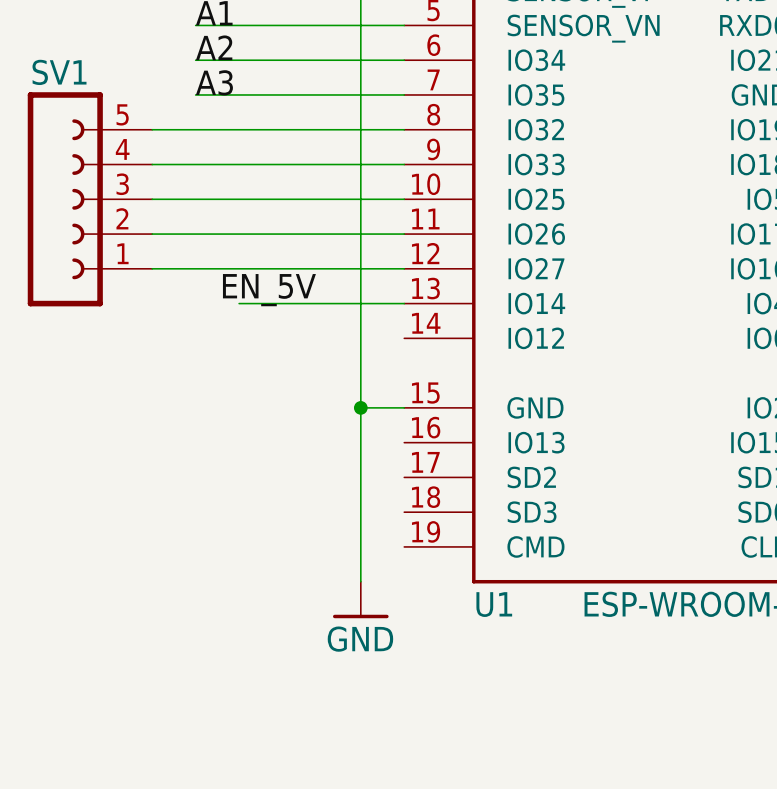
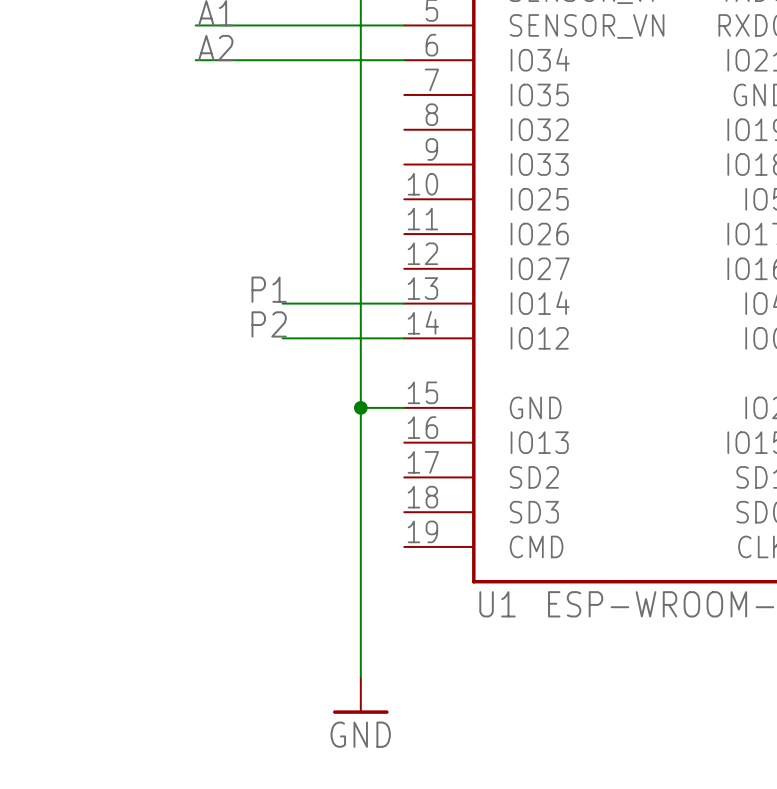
label: A3 (214, 82) -> none
wire: (195, 94) (404, 94) -> none
wire: (152, 129) (404, 129) -> none
wire: (152, 164) (404, 164) -> none
SV1: (89, 199) -> none
wire: (152, 199) (404, 199) -> none
wire: (152, 234) (404, 234) -> none
wire: (152, 268) (404, 268) -> none
label: none -> P1 (269, 289)
label: EN_5V (269, 290) -> none
wire: (239, 303) (282, 303) -> none
label: none -> P2 (269, 324)
wire: none -> (282, 338) (404, 338)
wire: none -> (360, 581) (360, 677)
power symbol position: GND (360, 599) -> GND (360, 695)

